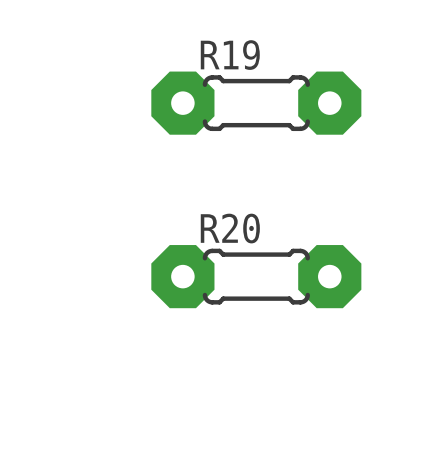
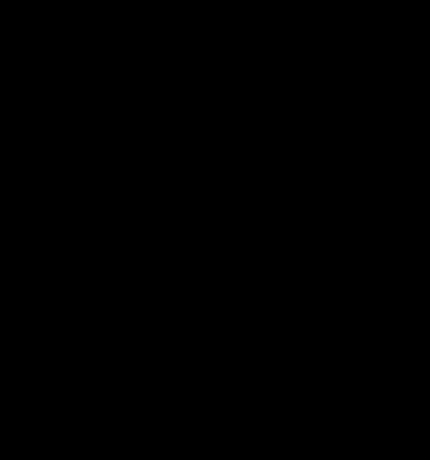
R19: (256, 103) -> none
R20: (256, 276) -> none

